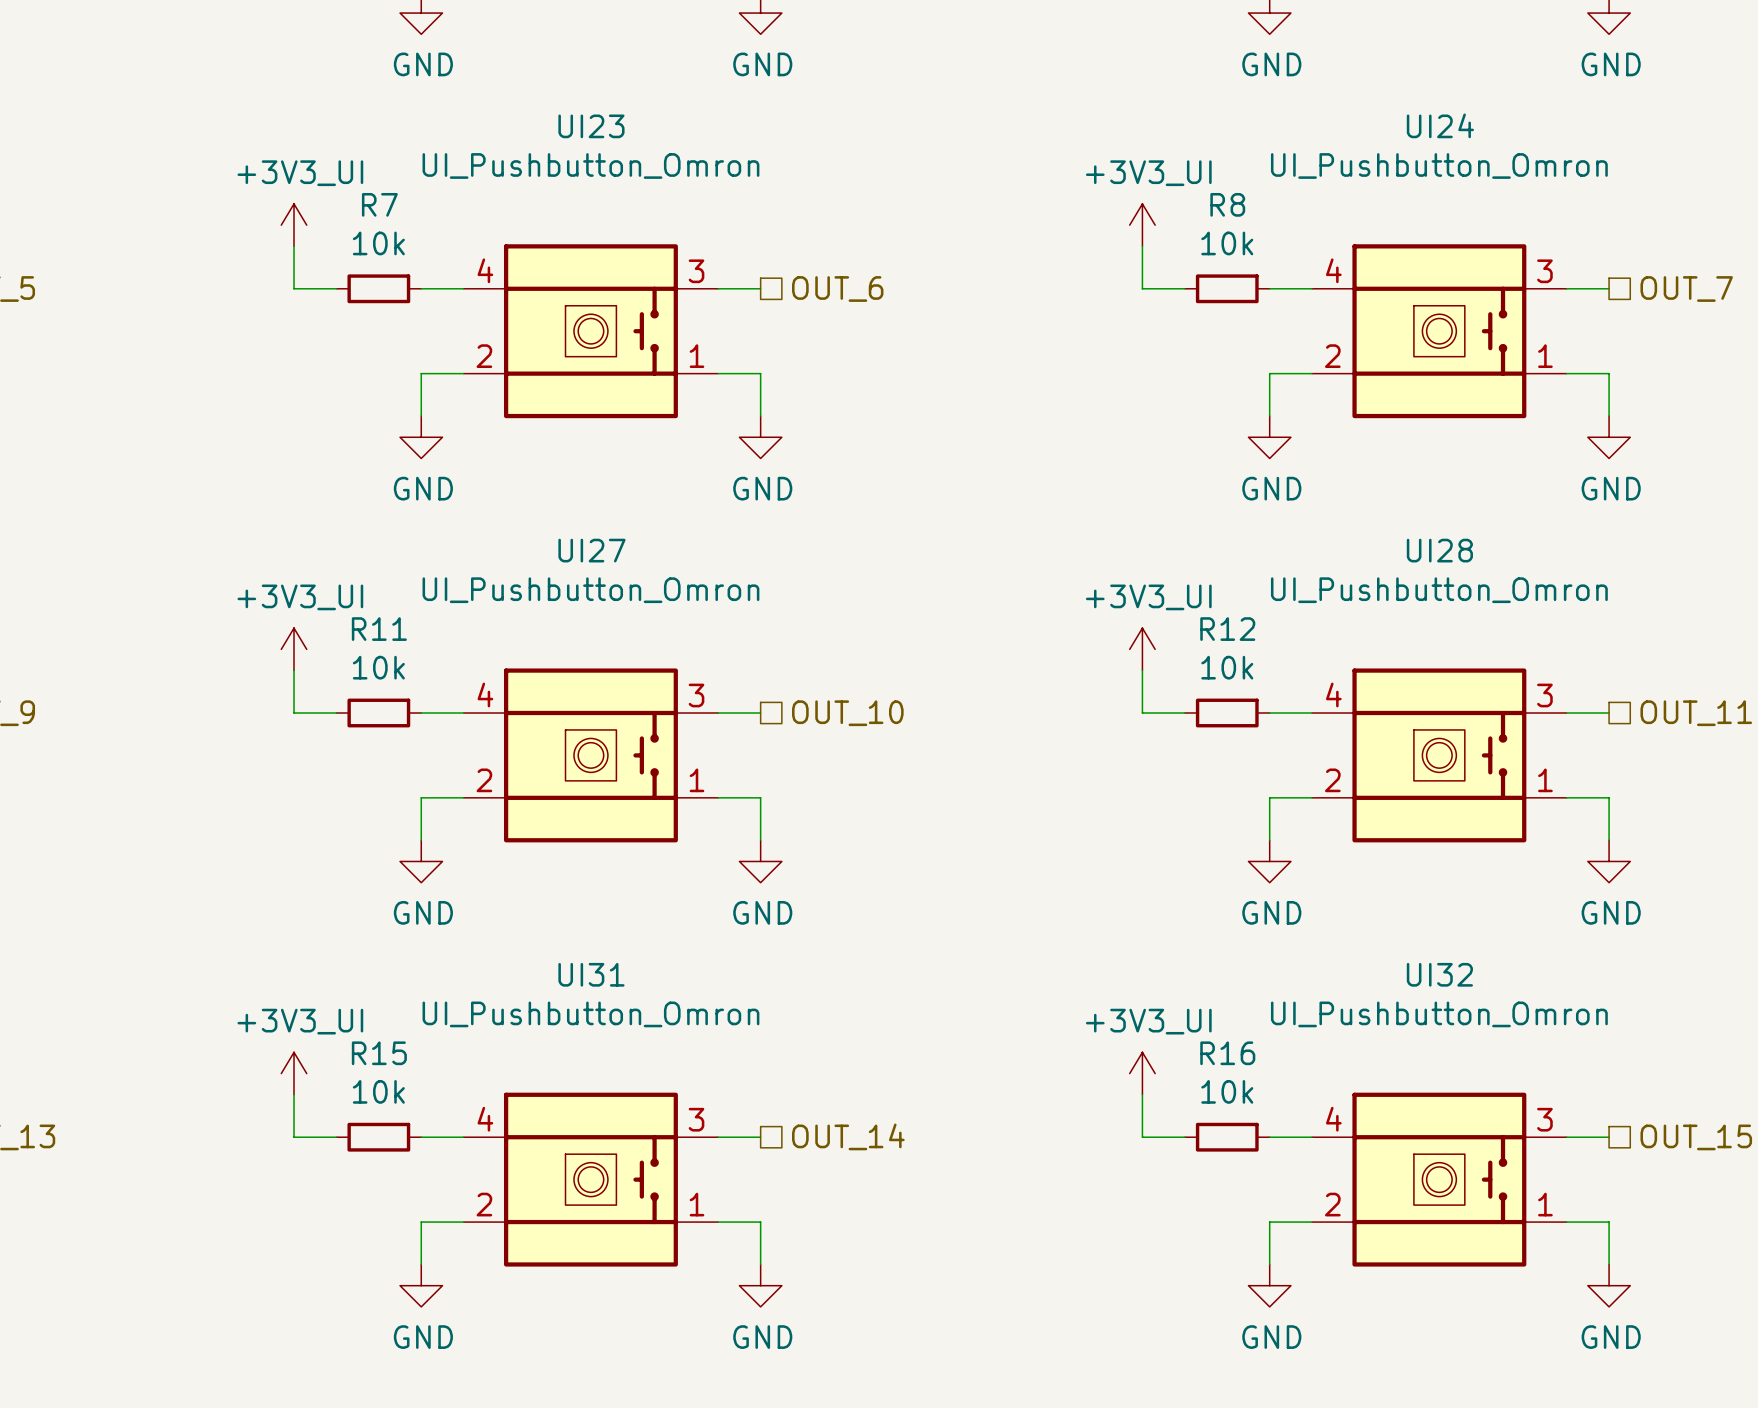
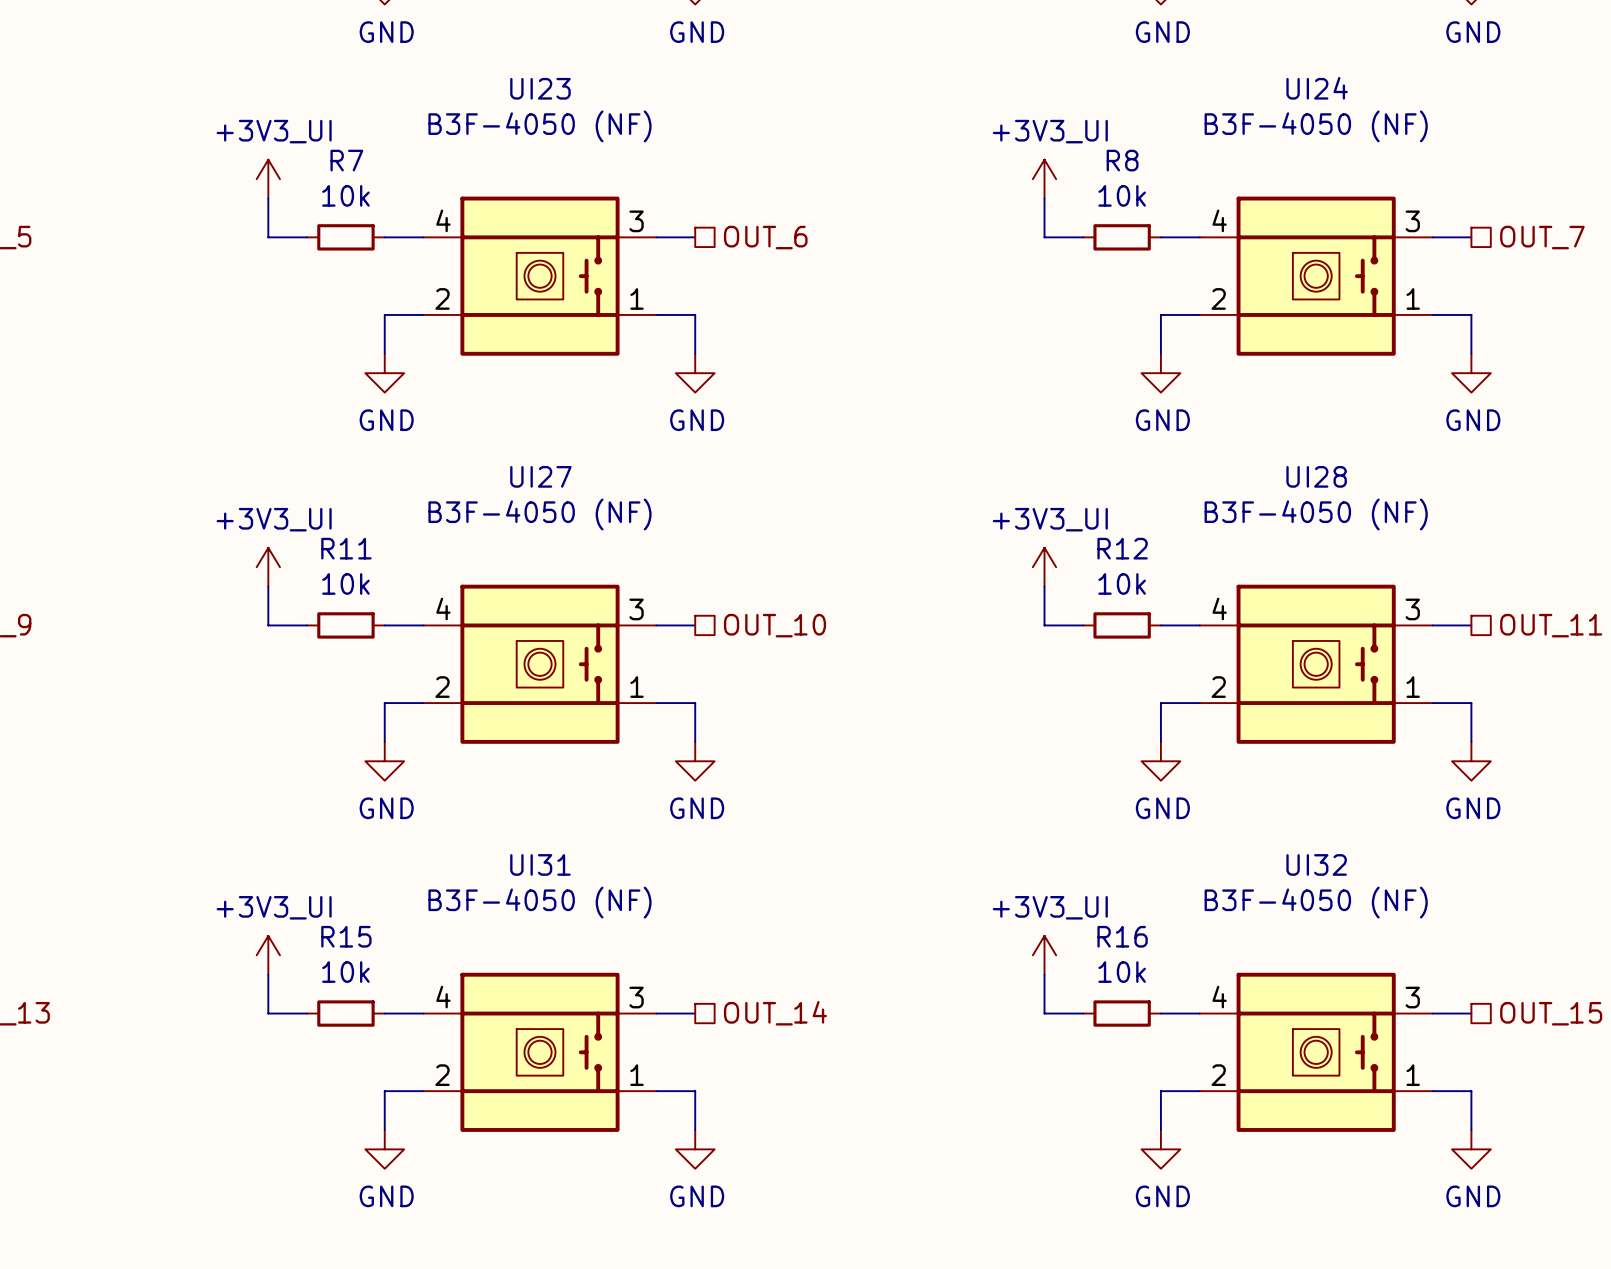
UI23 value: UI_Pushbutton_Omron (590, 165) -> B3F-4050 (NF) (539, 126)
UI24 value: UI_Pushbutton_Omron (1439, 165) -> B3F-4050 (NF) (1316, 126)
UI27 value: UI_Pushbutton_Omron (590, 590) -> B3F-4050 (NF) (539, 514)
UI28 value: UI_Pushbutton_Omron (1439, 590) -> B3F-4050 (NF) (1316, 514)
UI31 value: UI_Pushbutton_Omron (590, 1014) -> B3F-4050 (NF) (539, 902)
UI32 value: UI_Pushbutton_Omron (1439, 1014) -> B3F-4050 (NF) (1316, 902)

